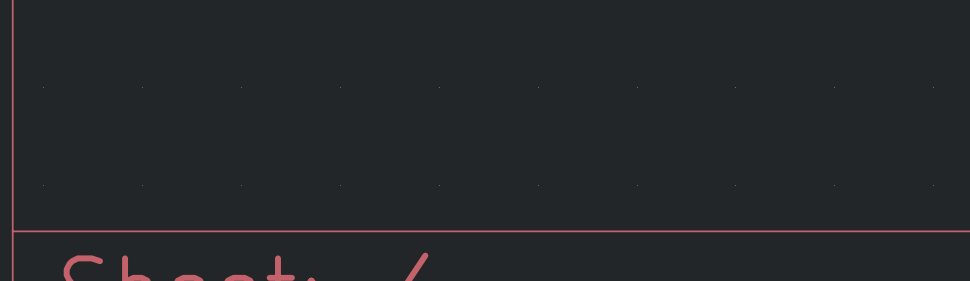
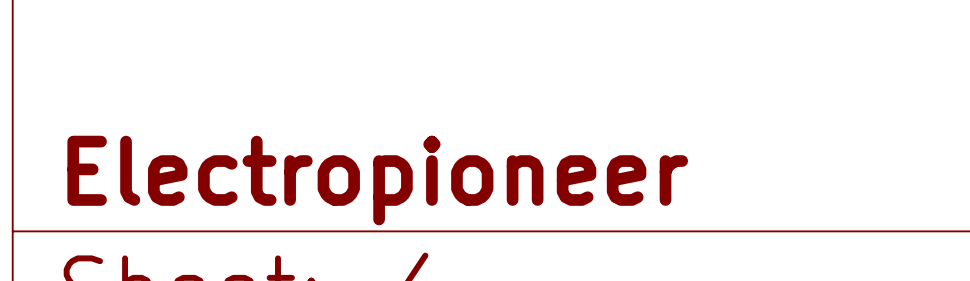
title block: none -> Electropioneer (377, 180)

